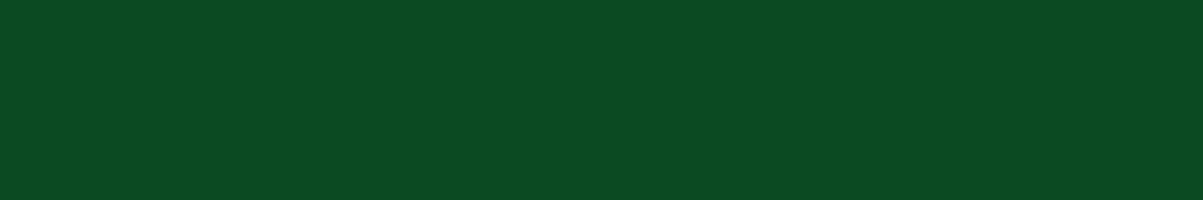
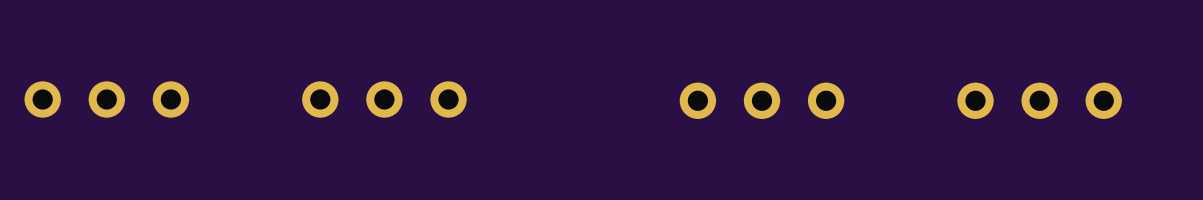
part: none -> (106, 99)
part: none -> (384, 99)
part: none -> (762, 100)
part: none -> (1039, 100)

